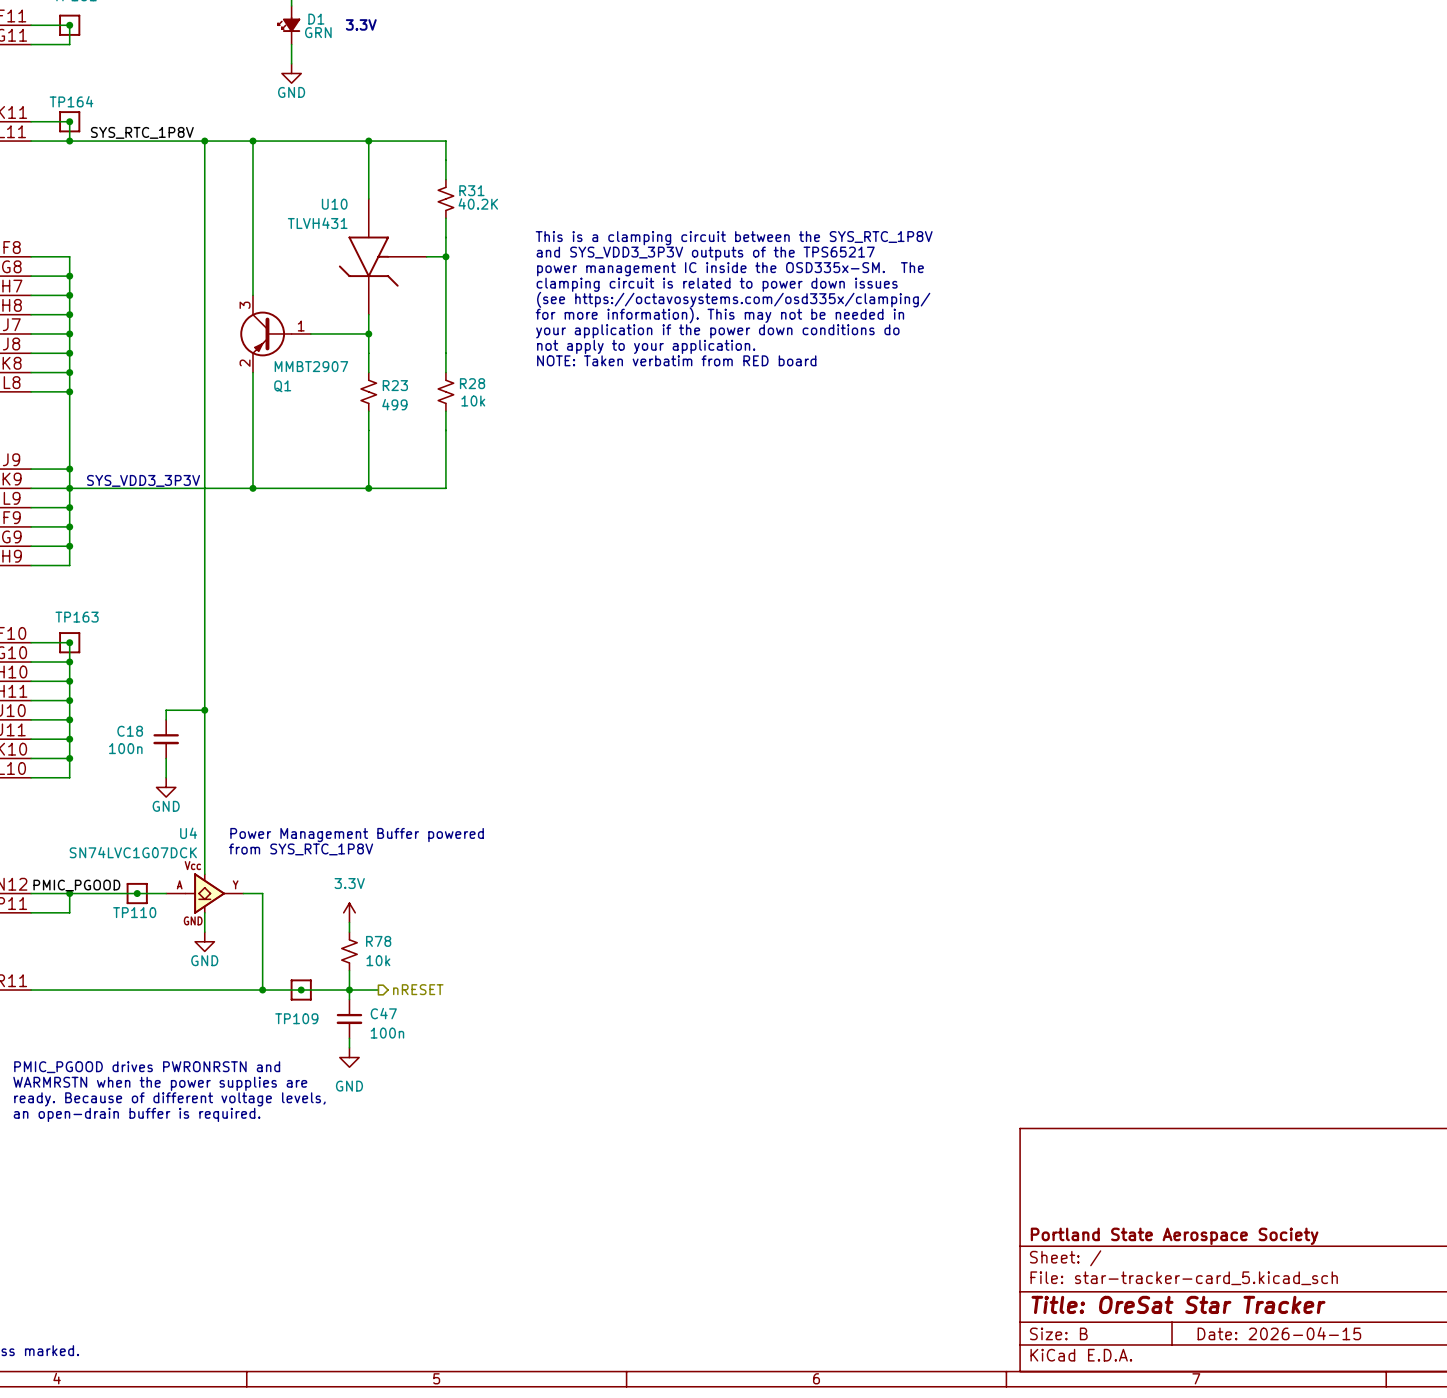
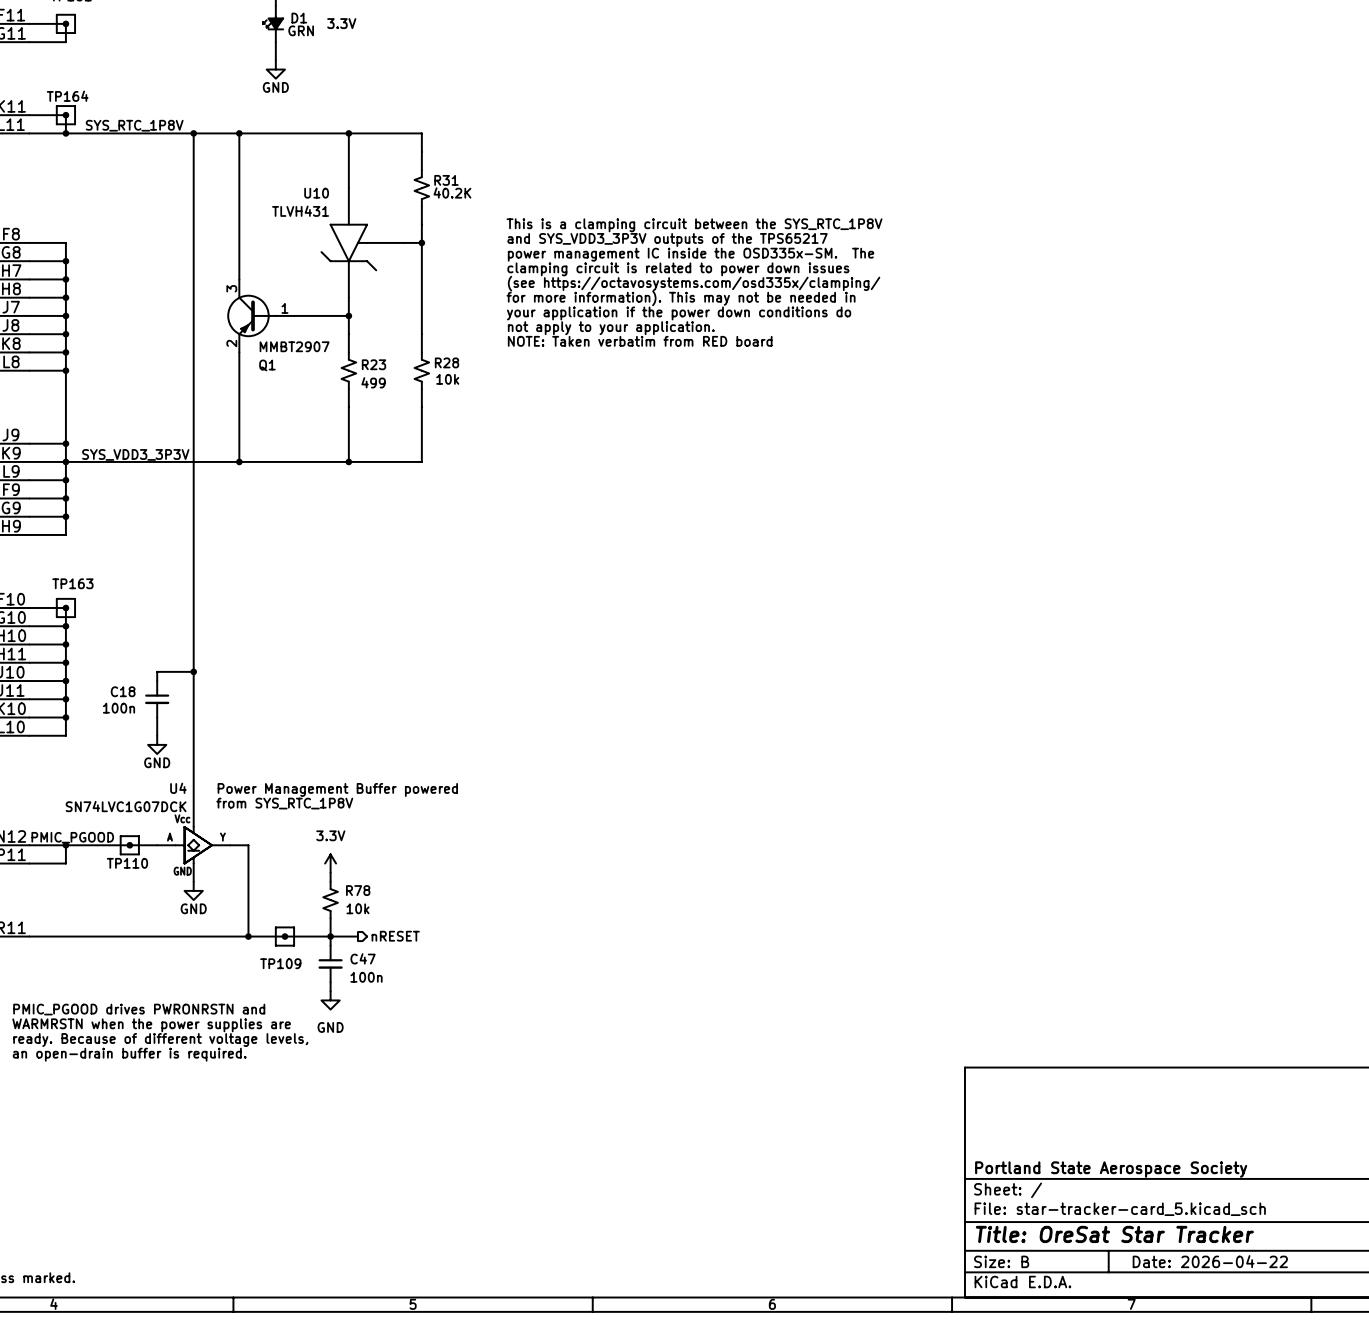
title block: Date: 2026-04-15 (1279, 1333) -> Date: 2026-04-22 (1210, 1261)

